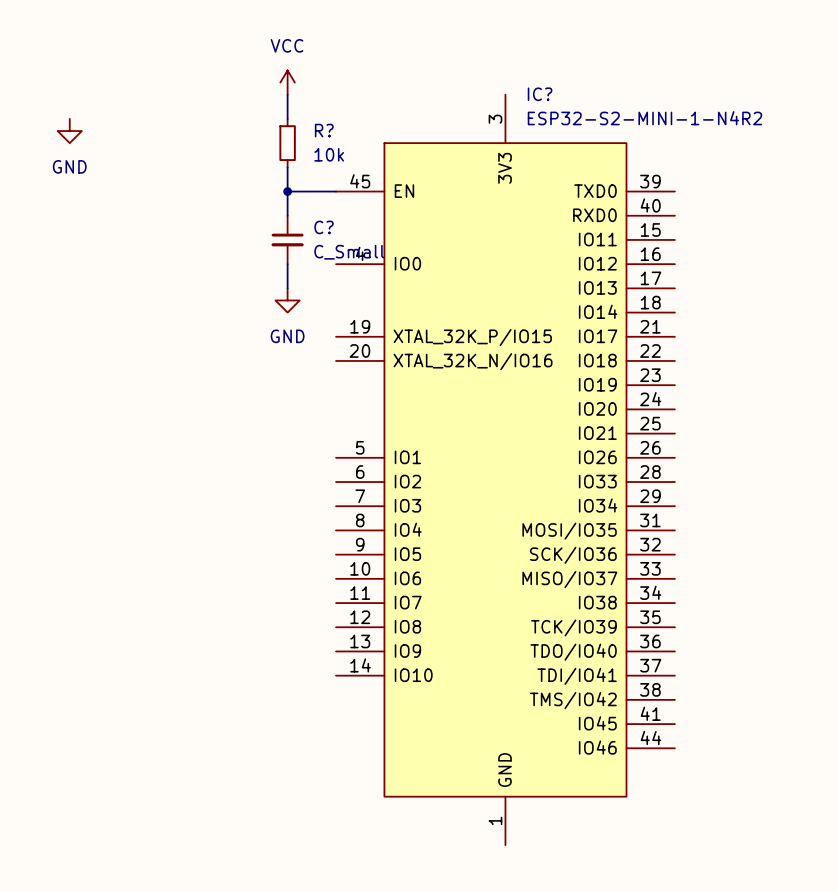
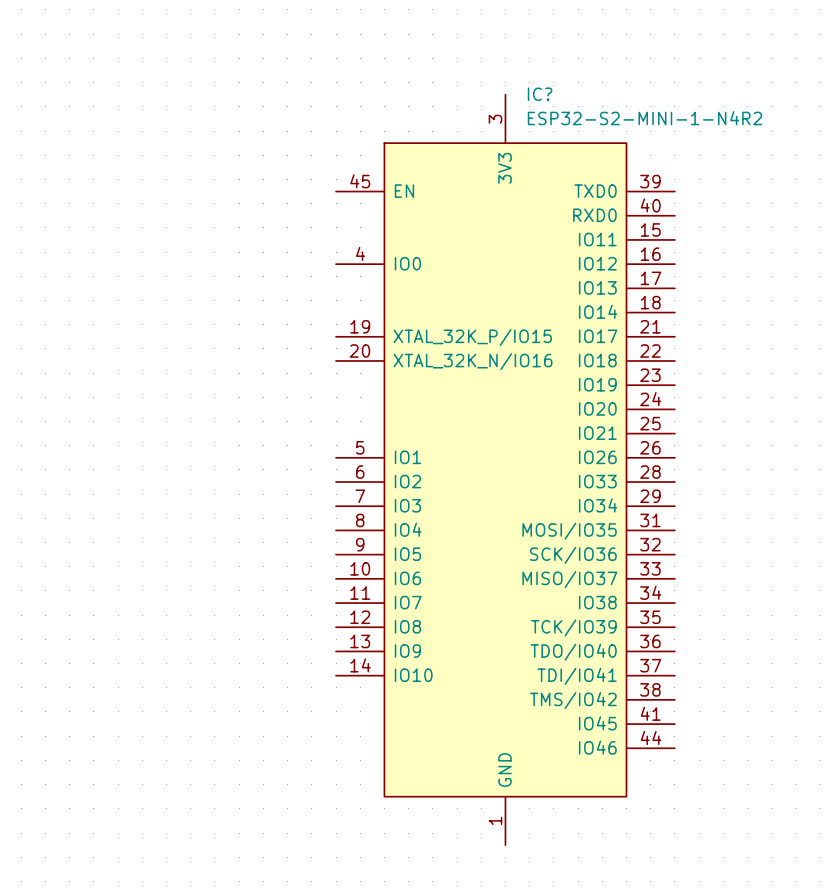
power symbol: VCC (287, 82) -> none
wire: (287, 94) (287, 118) -> none
power symbol: GND (69, 131) -> none
R?: 10k (287, 143) -> none
wire: (287, 167) (287, 215) -> none
wire: (287, 191) (336, 191) -> none
junction: (287, 191) -> none
C?: C_Small (287, 239) -> none
wire: (287, 264) (287, 288) -> none
power symbol: GND (287, 300) -> none

